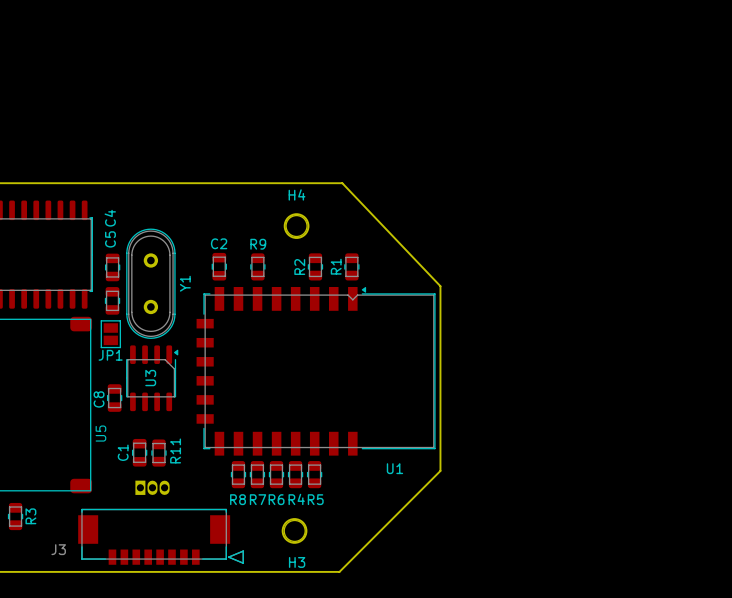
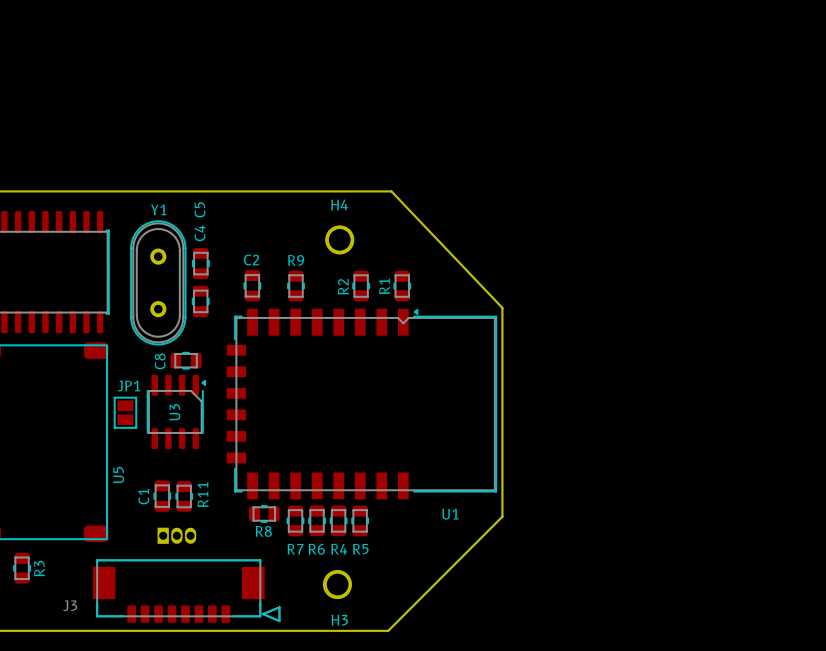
C4 name position: C4 (110, 218) -> C4 (199, 233)
C5 name position: C5 (110, 239) -> C5 (199, 209)
C4 position: (112, 267) -> (200, 301)
Y1 rotation: 0° (150, 283) -> 180° (158, 282)
Y1 name position: Y1 (185, 283) -> Y1 (158, 209)
C5 position: (112, 300) -> (200, 263)
JP1 position: (110, 334) -> (125, 412)
C8 rotation: 0° (114, 398) -> 90° clockwise (186, 360)
C8 position: (114, 398) -> (186, 360)
R8 rotation: 0° (238, 474) -> 90° clockwise (264, 514)

